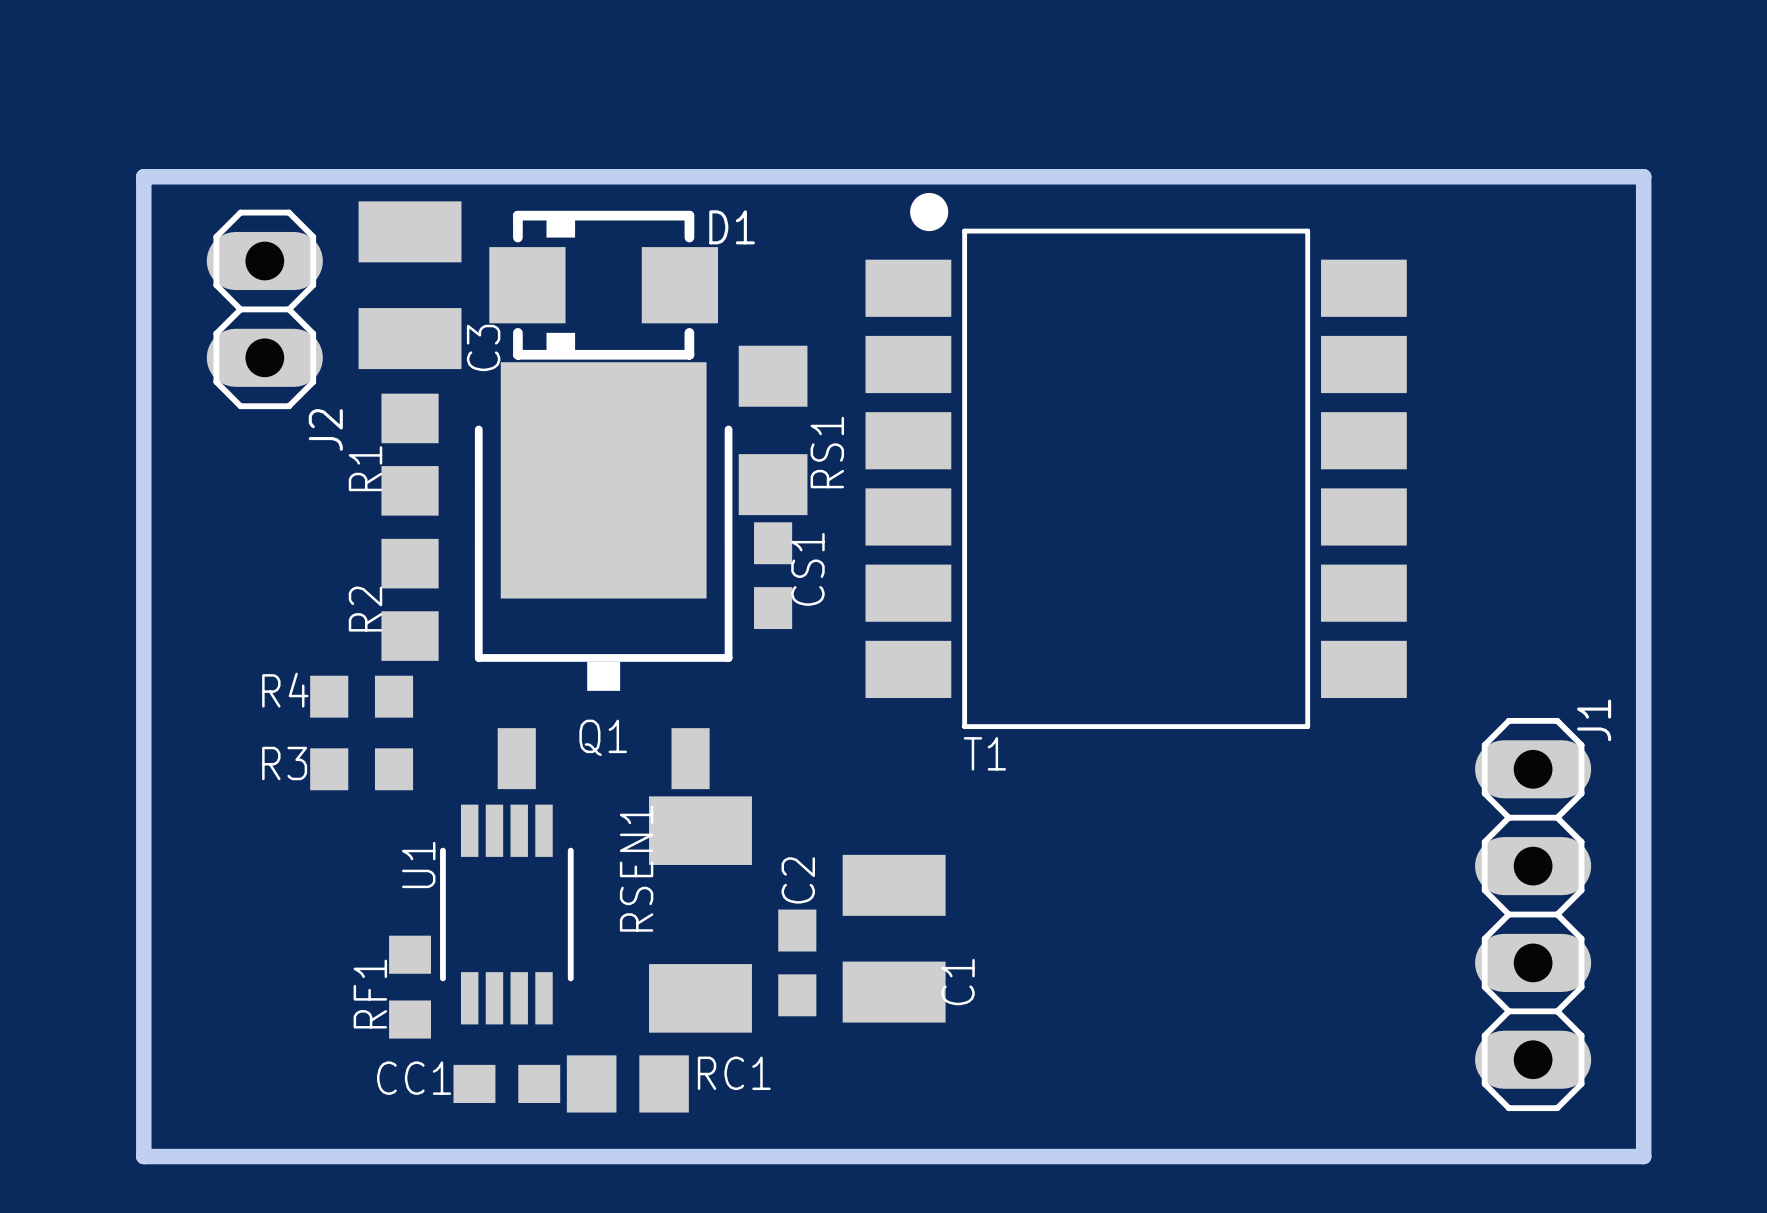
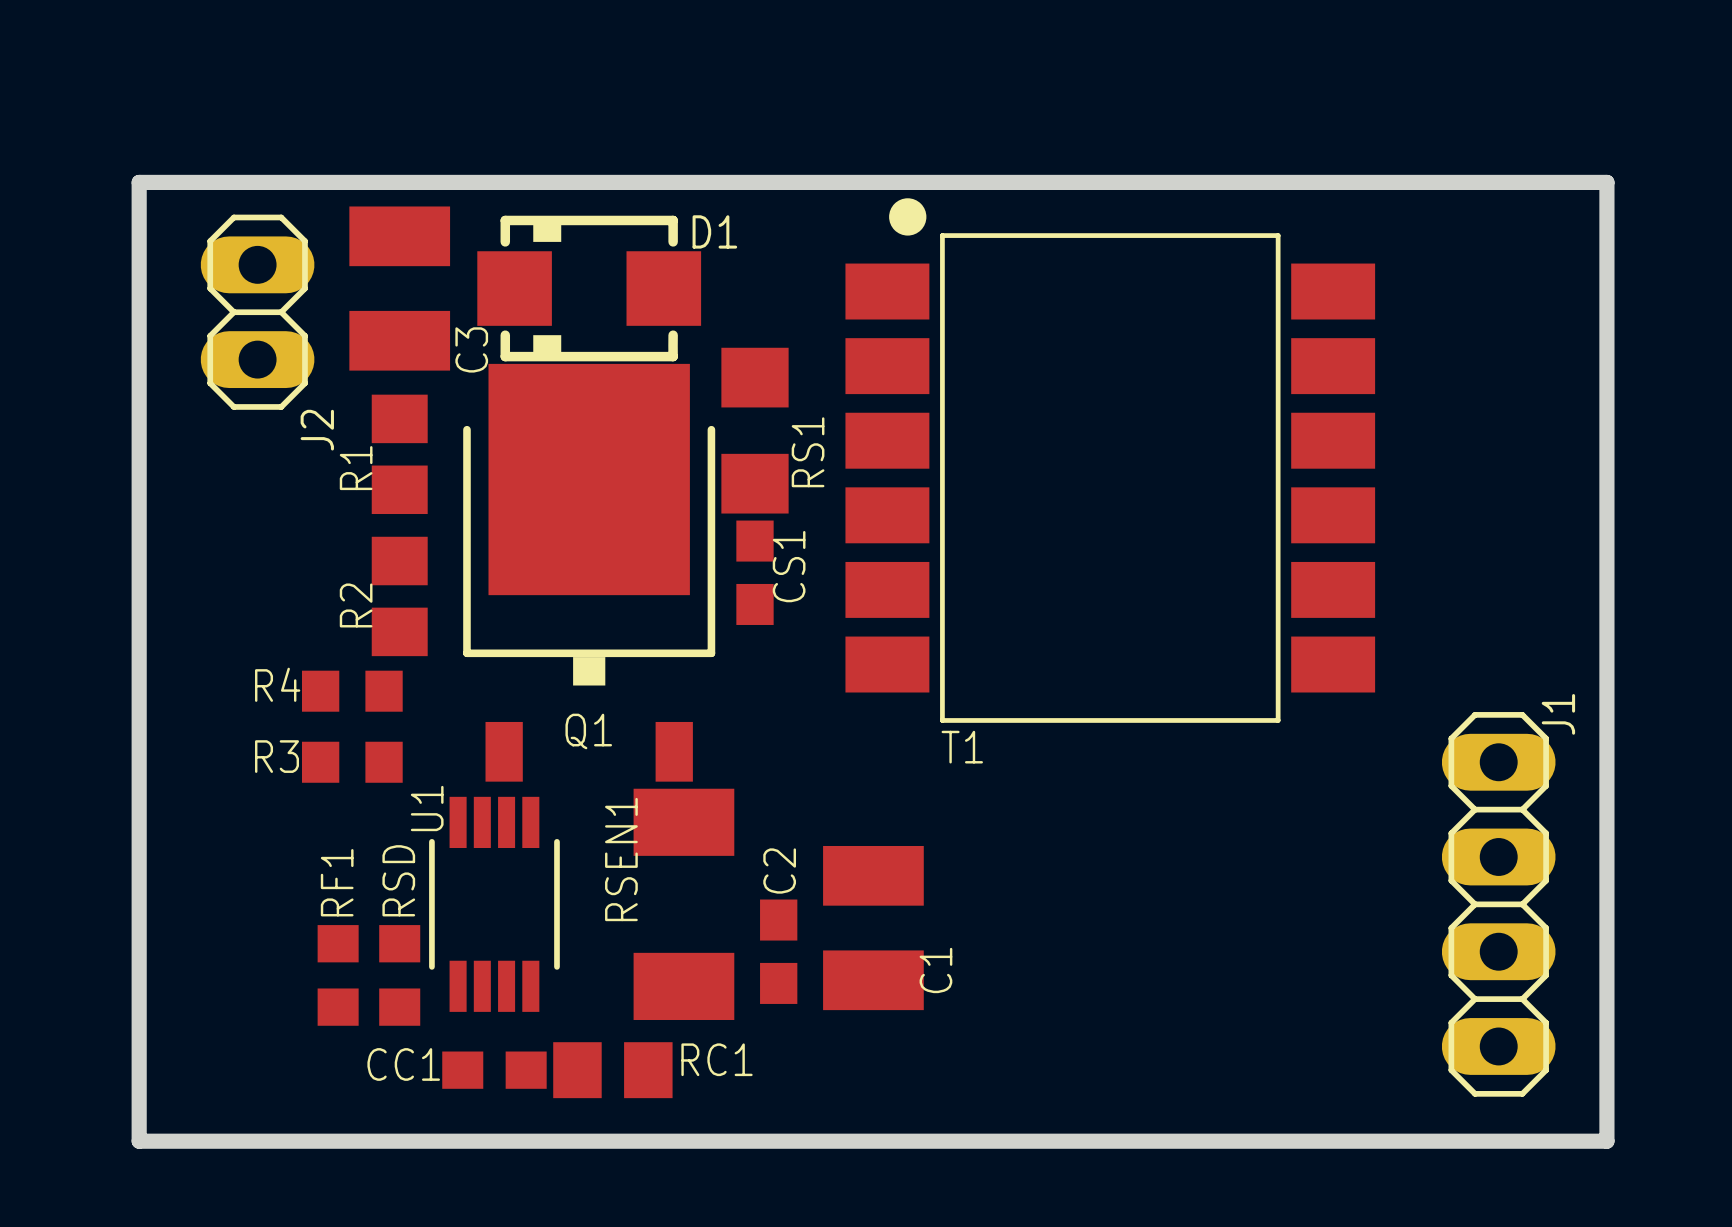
U1 name position: U1 (418, 864) -> U1 (427, 808)
RF1: none -> (338, 975)
RF1 name: RF1 (370, 994) -> RSD (398, 880)

